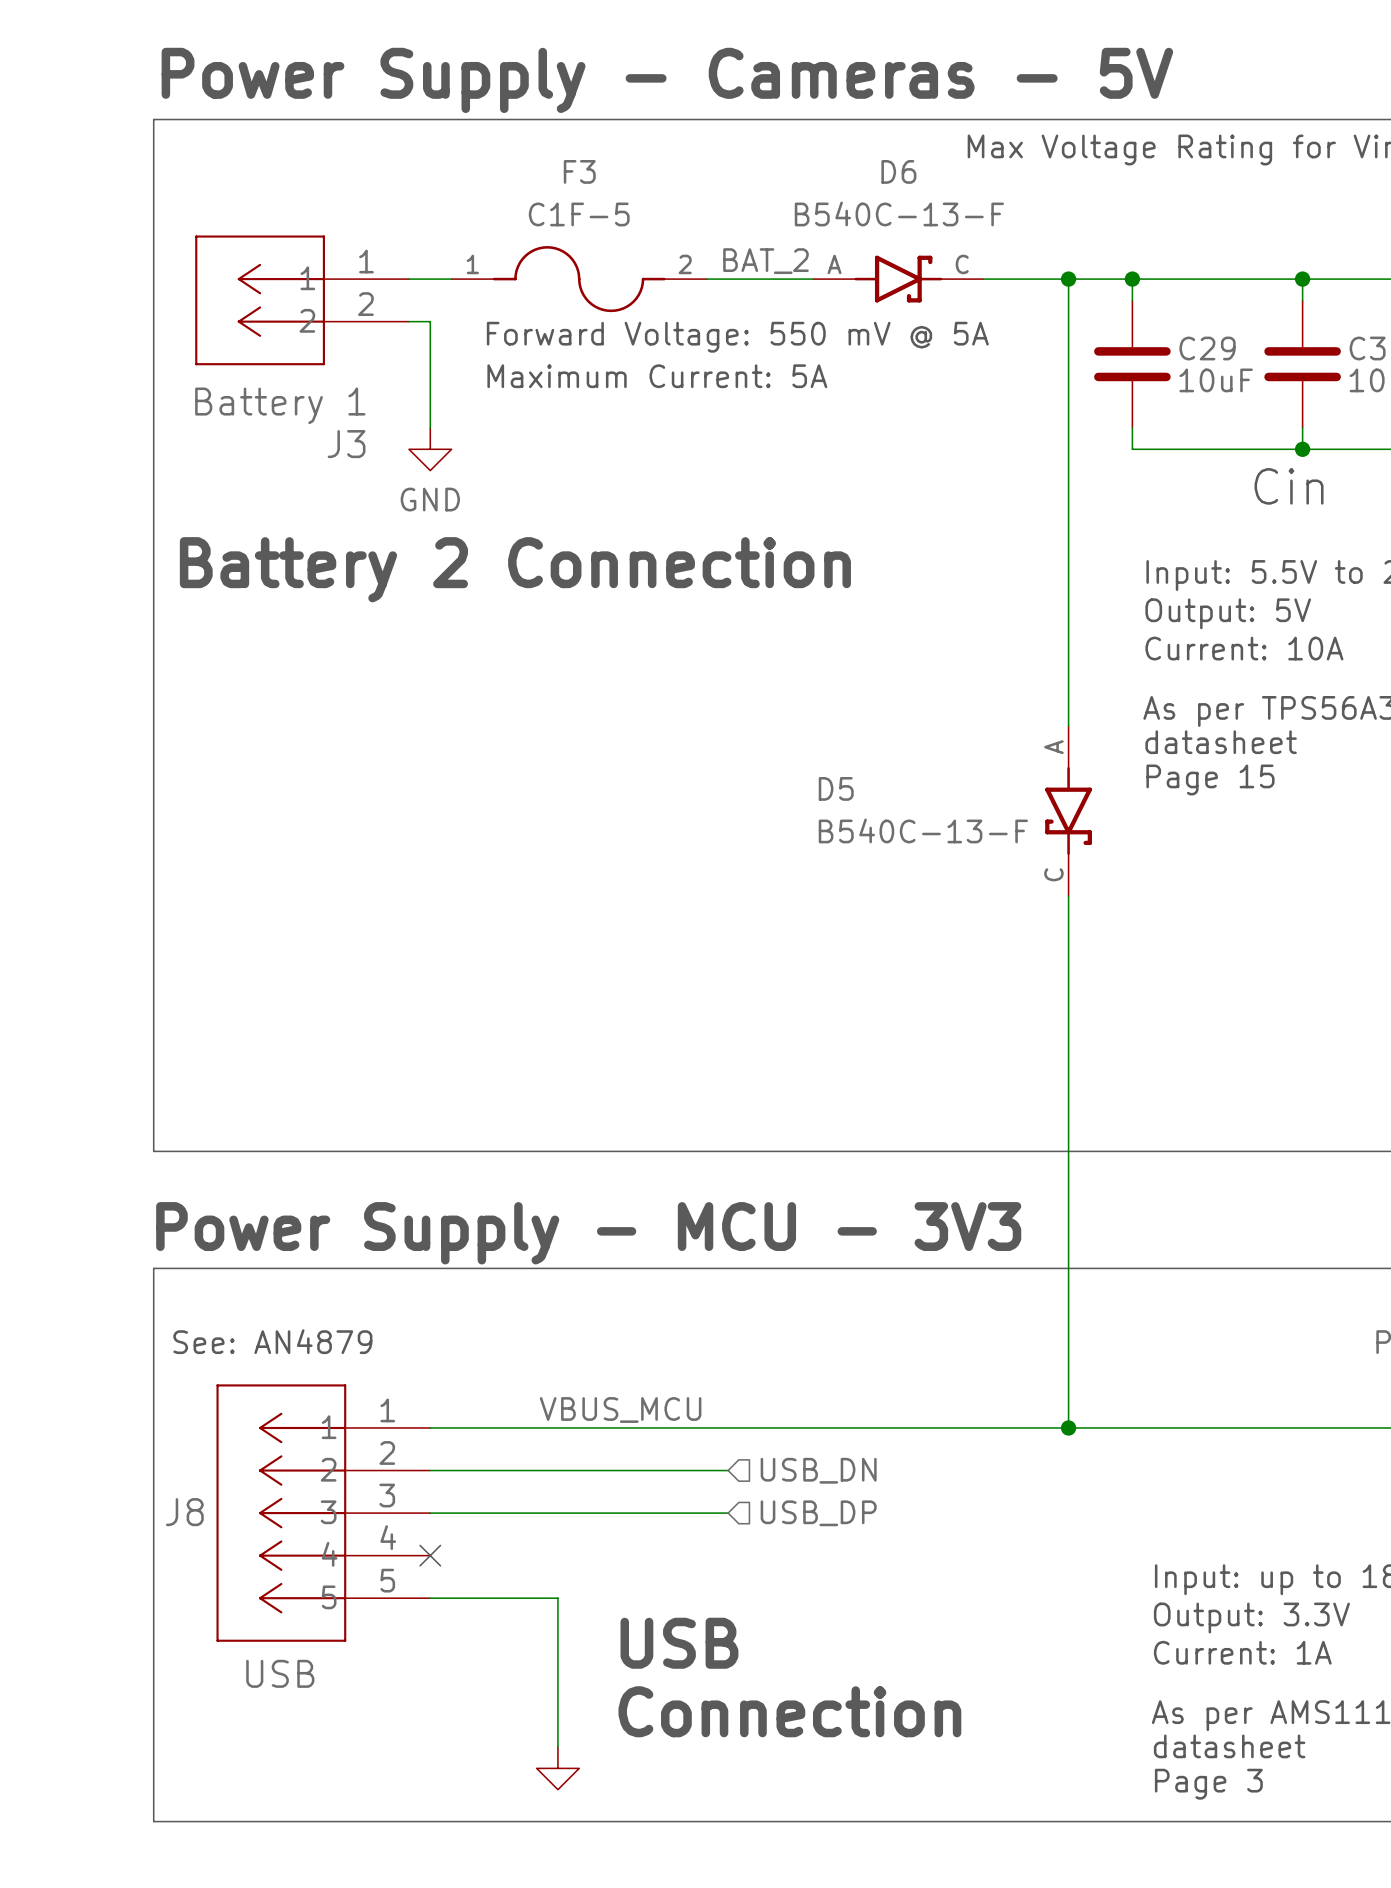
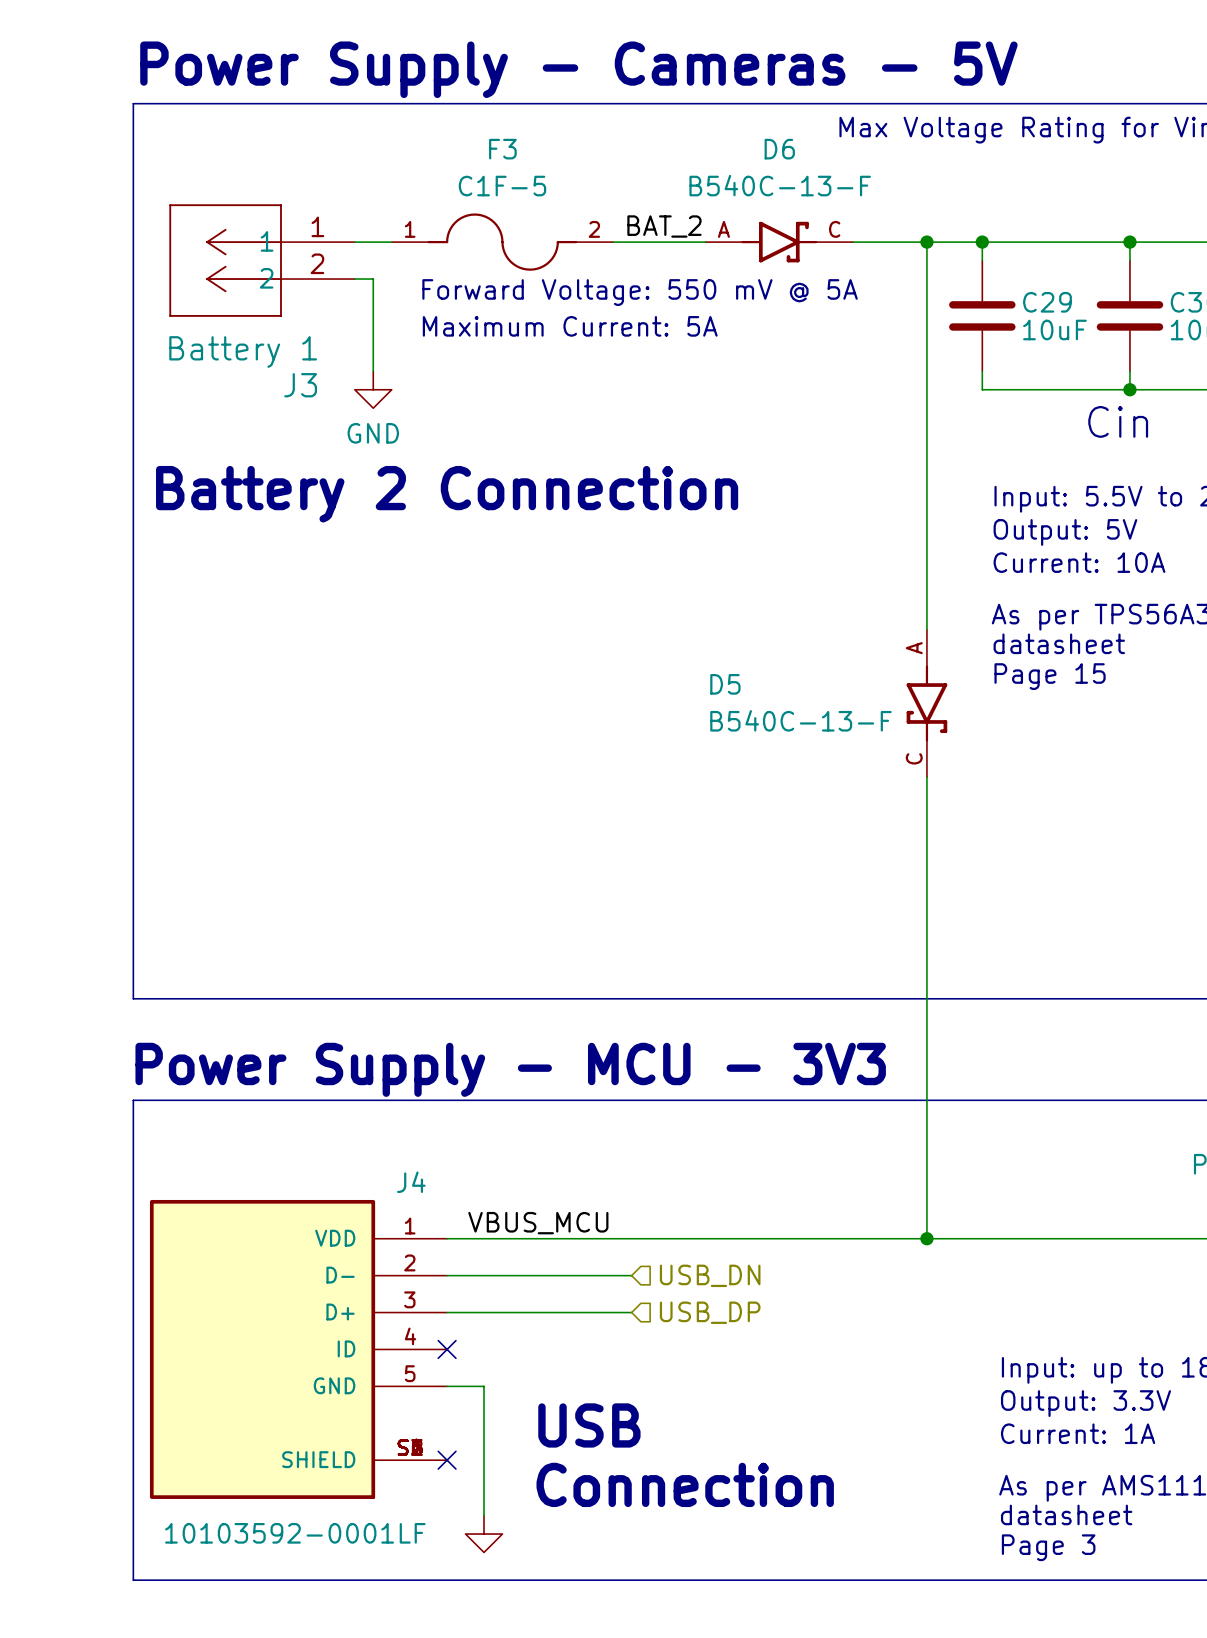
text: See: AN4879 (272, 1341) -> none
J8: USB (323, 1513) -> none
J4: none -> 10103592-0001LF (298, 1349)
no-connect mark: (430, 1555) -> none
no-connect mark: none -> (447, 1349)
no-connect mark: none -> (447, 1460)

